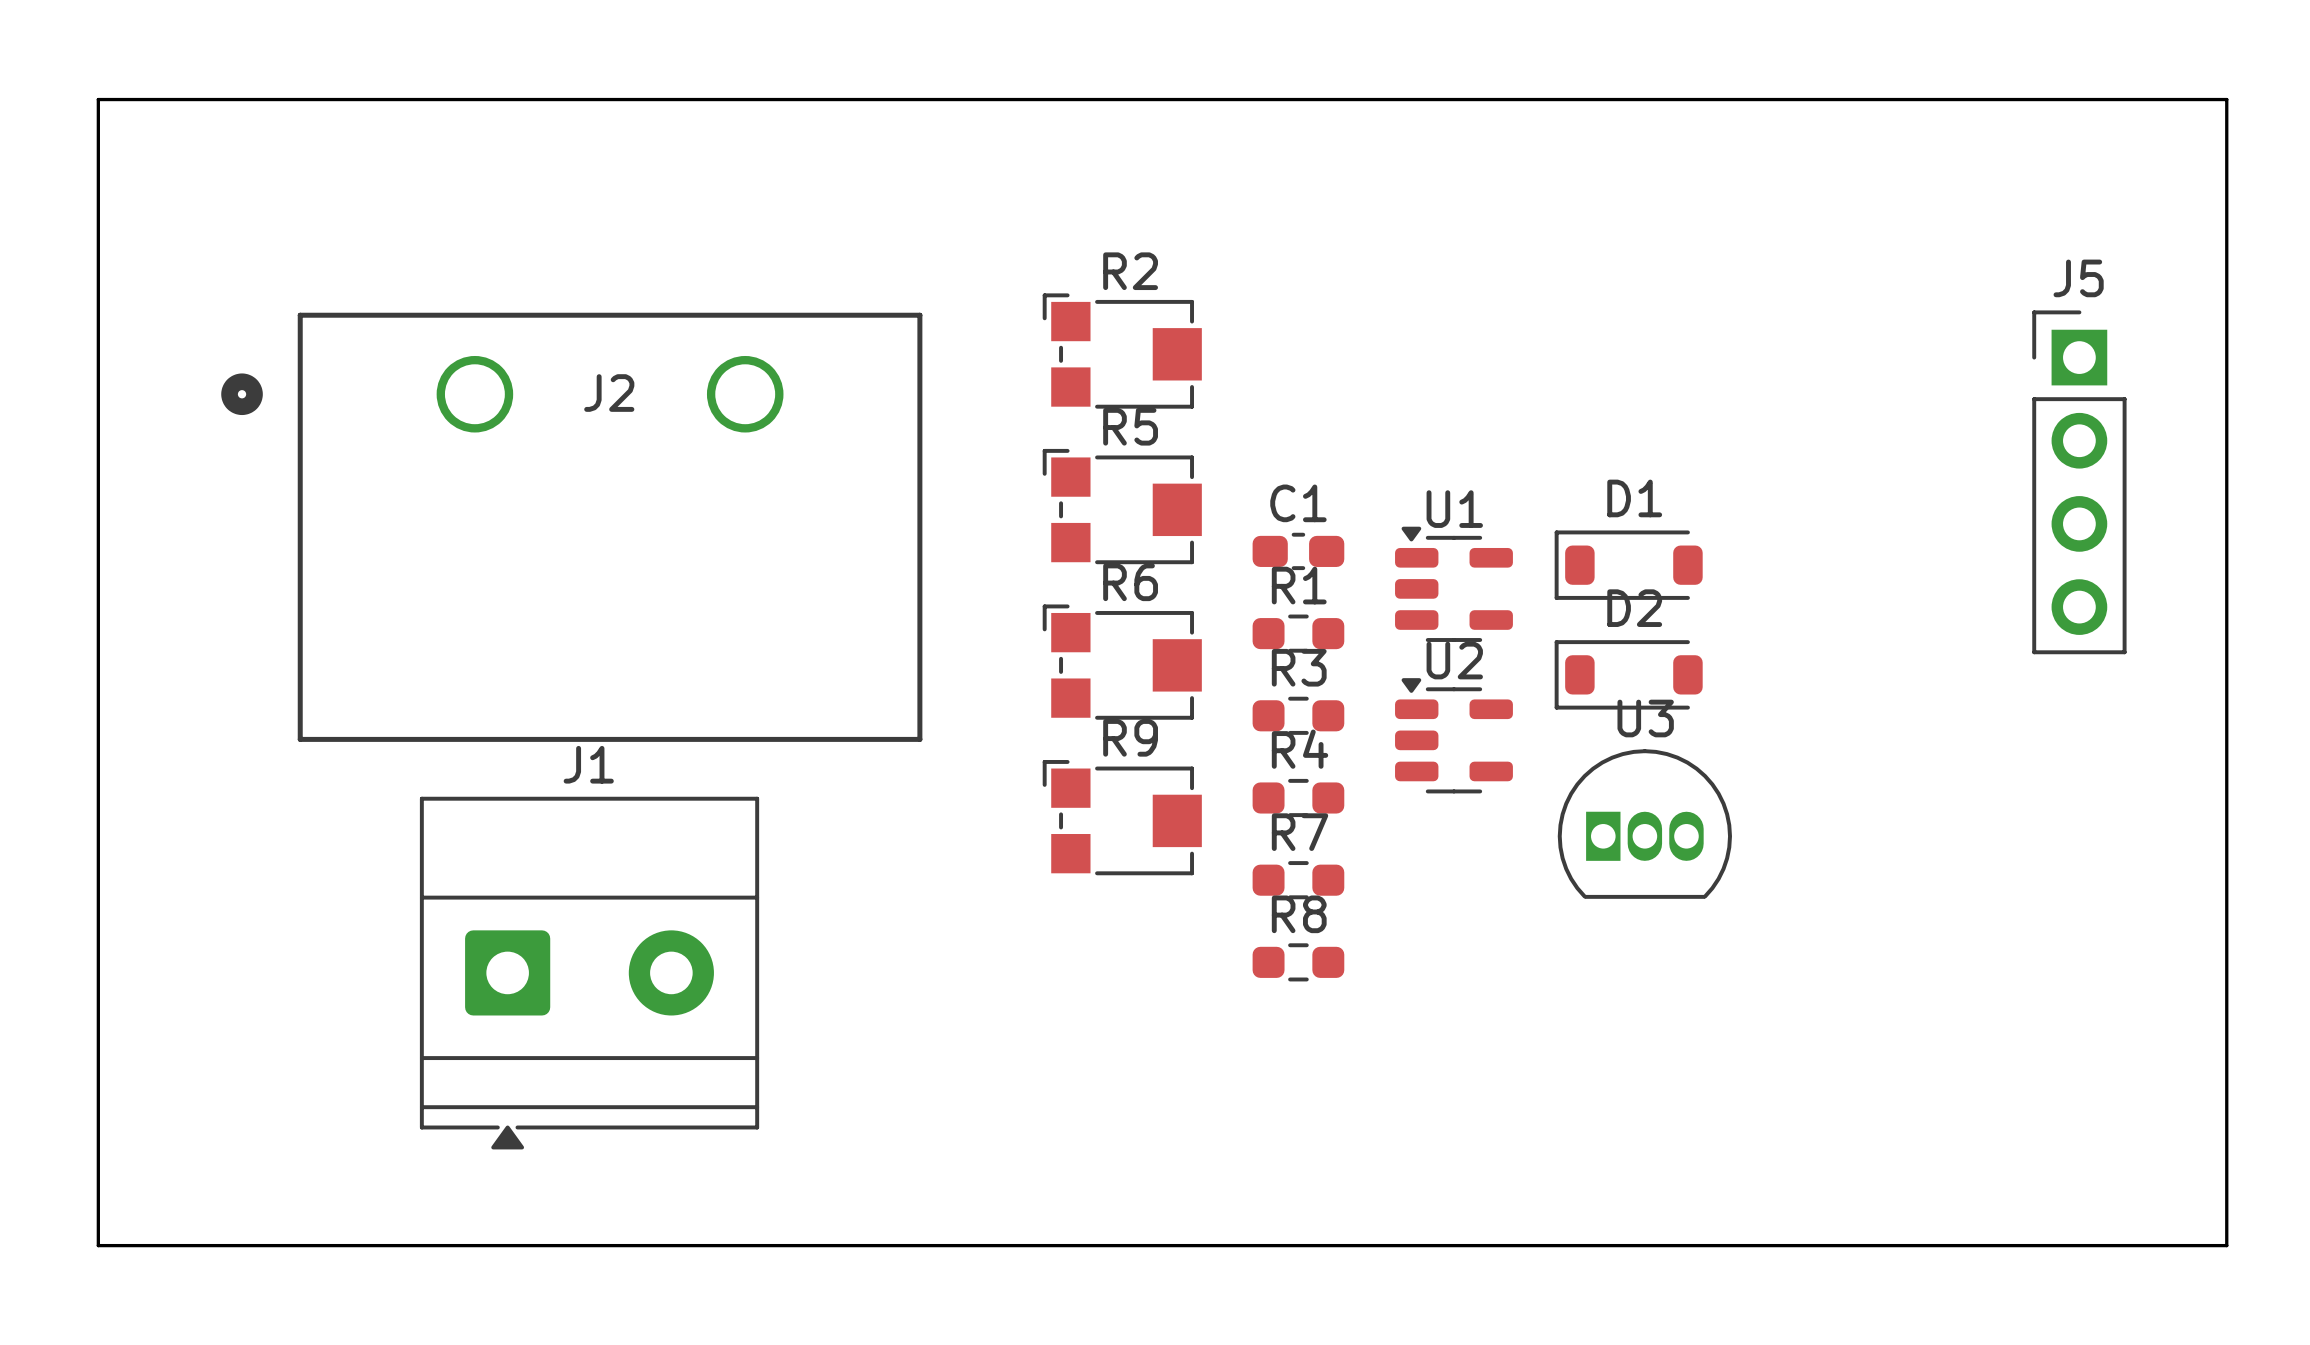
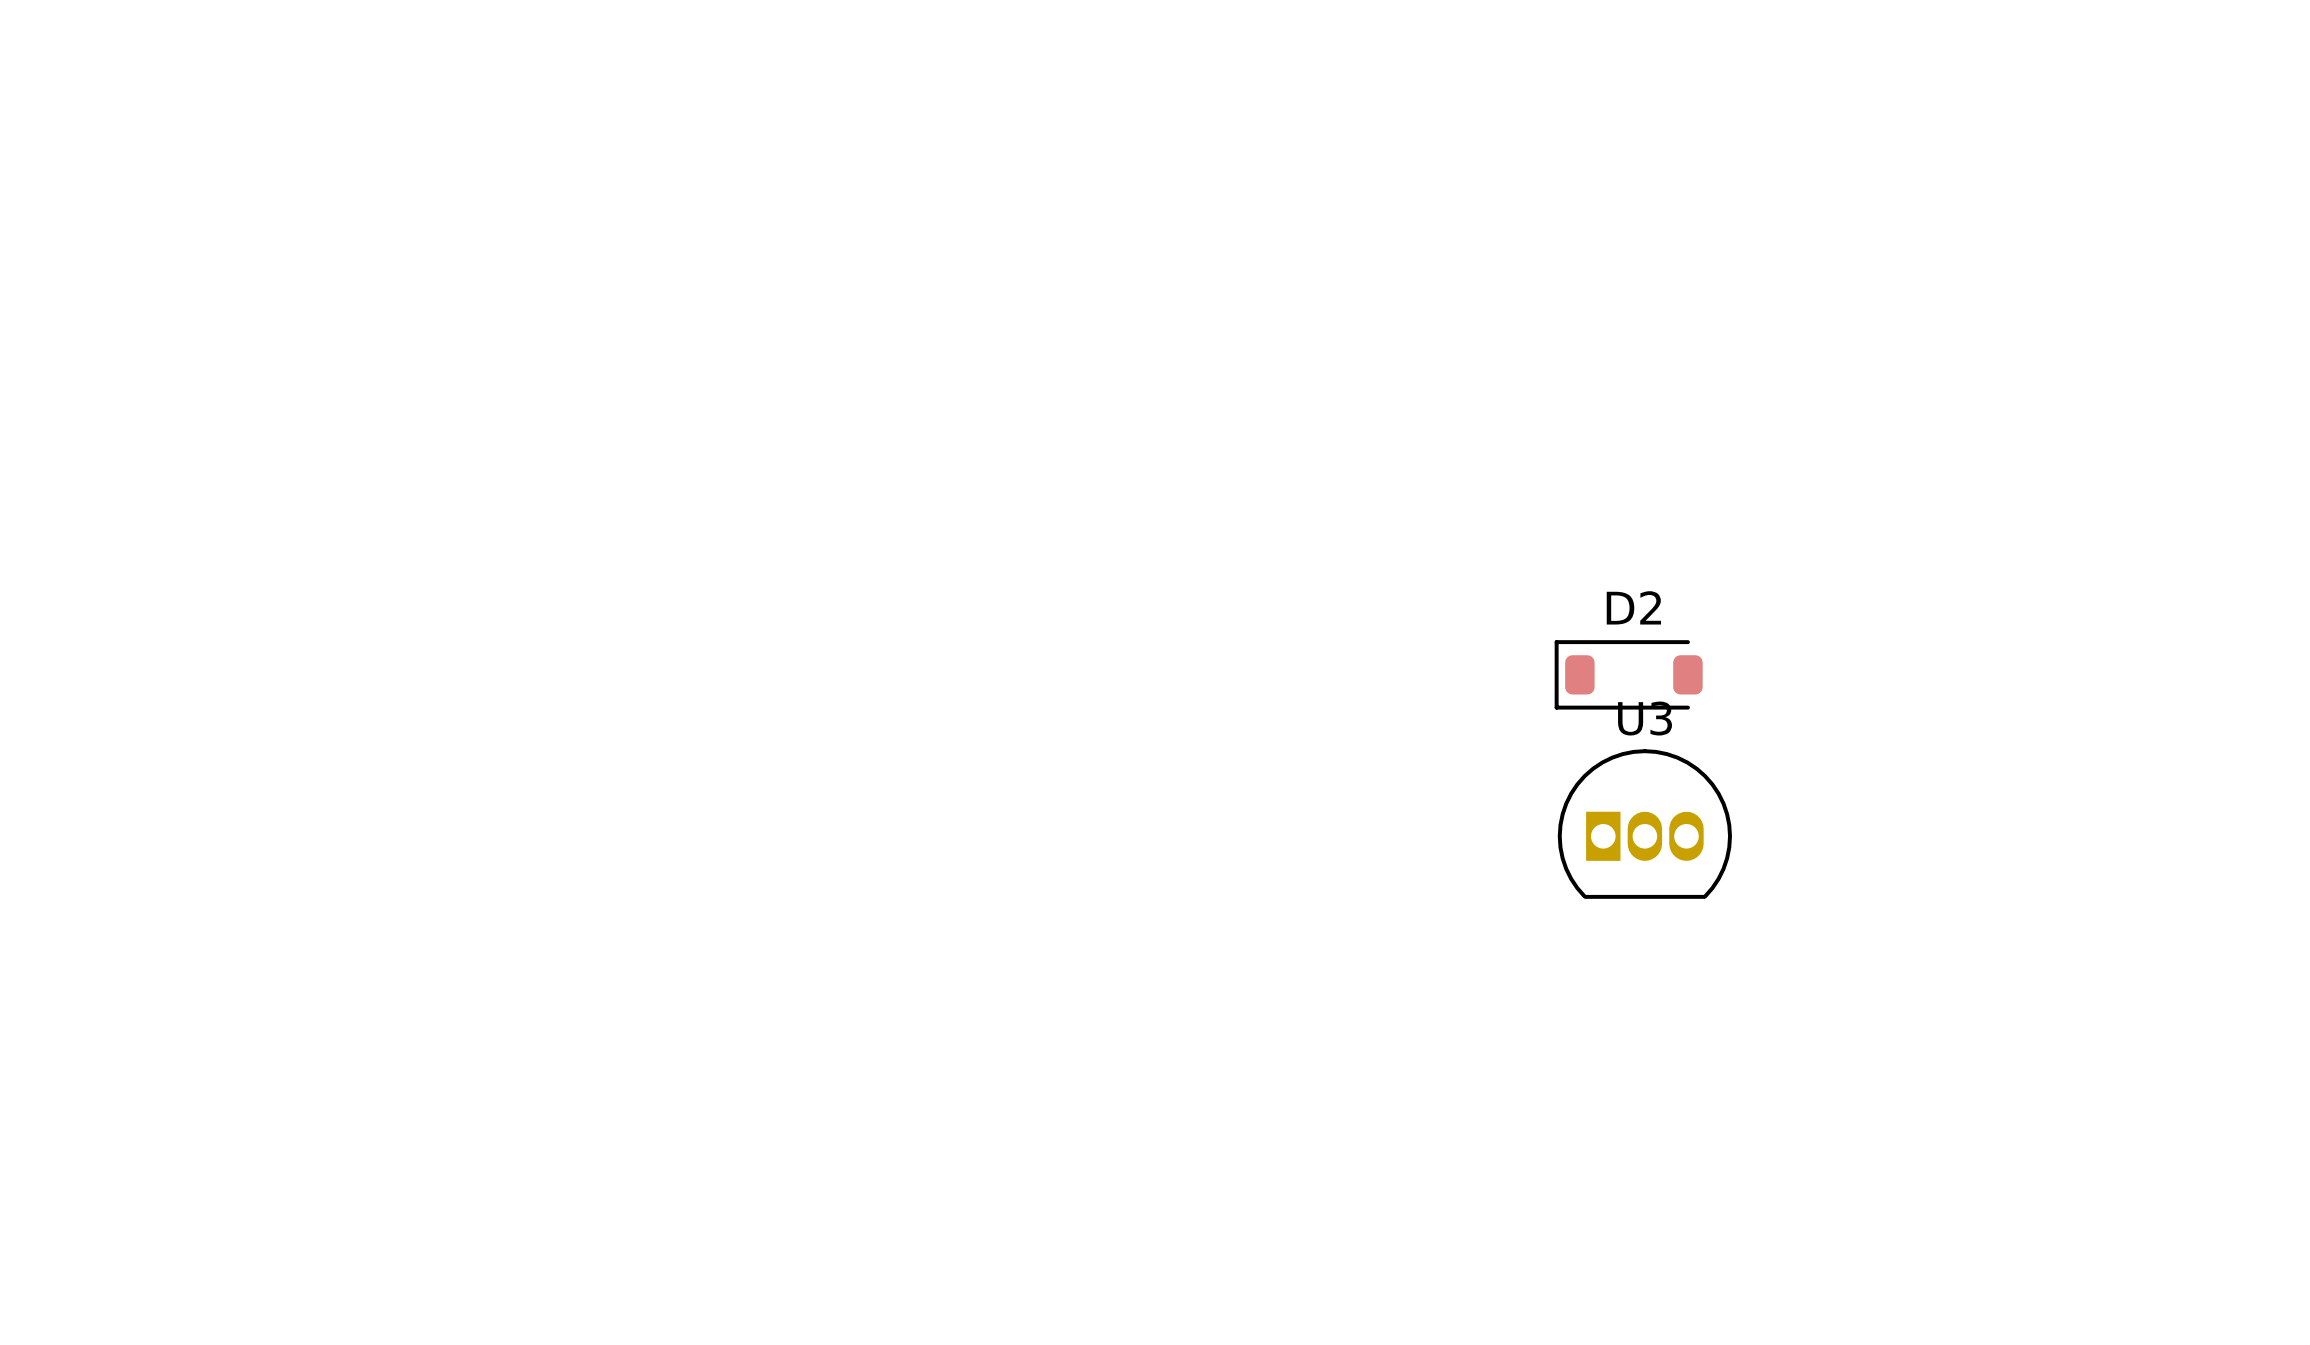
board edge: (98, 99) (2226, 99) (2226, 1245) (98, 1245) (98, 99) -> none
R2: (1122, 351) -> none
J5: (2079, 482) -> none
R5: (1122, 506) -> none
J2: (571, 527) -> none
C1: (1298, 551) -> none
D1: (1628, 565) -> none
U1: (1453, 584) -> none
R1: (1298, 633) -> none
R6: (1122, 662) -> none
R3: (1298, 715) -> none
U2: (1453, 735) -> none
R4: (1298, 797) -> none
R9: (1122, 817) -> none
R7: (1298, 880) -> none
R8: (1298, 962) -> none
J1: (589, 973) -> none

